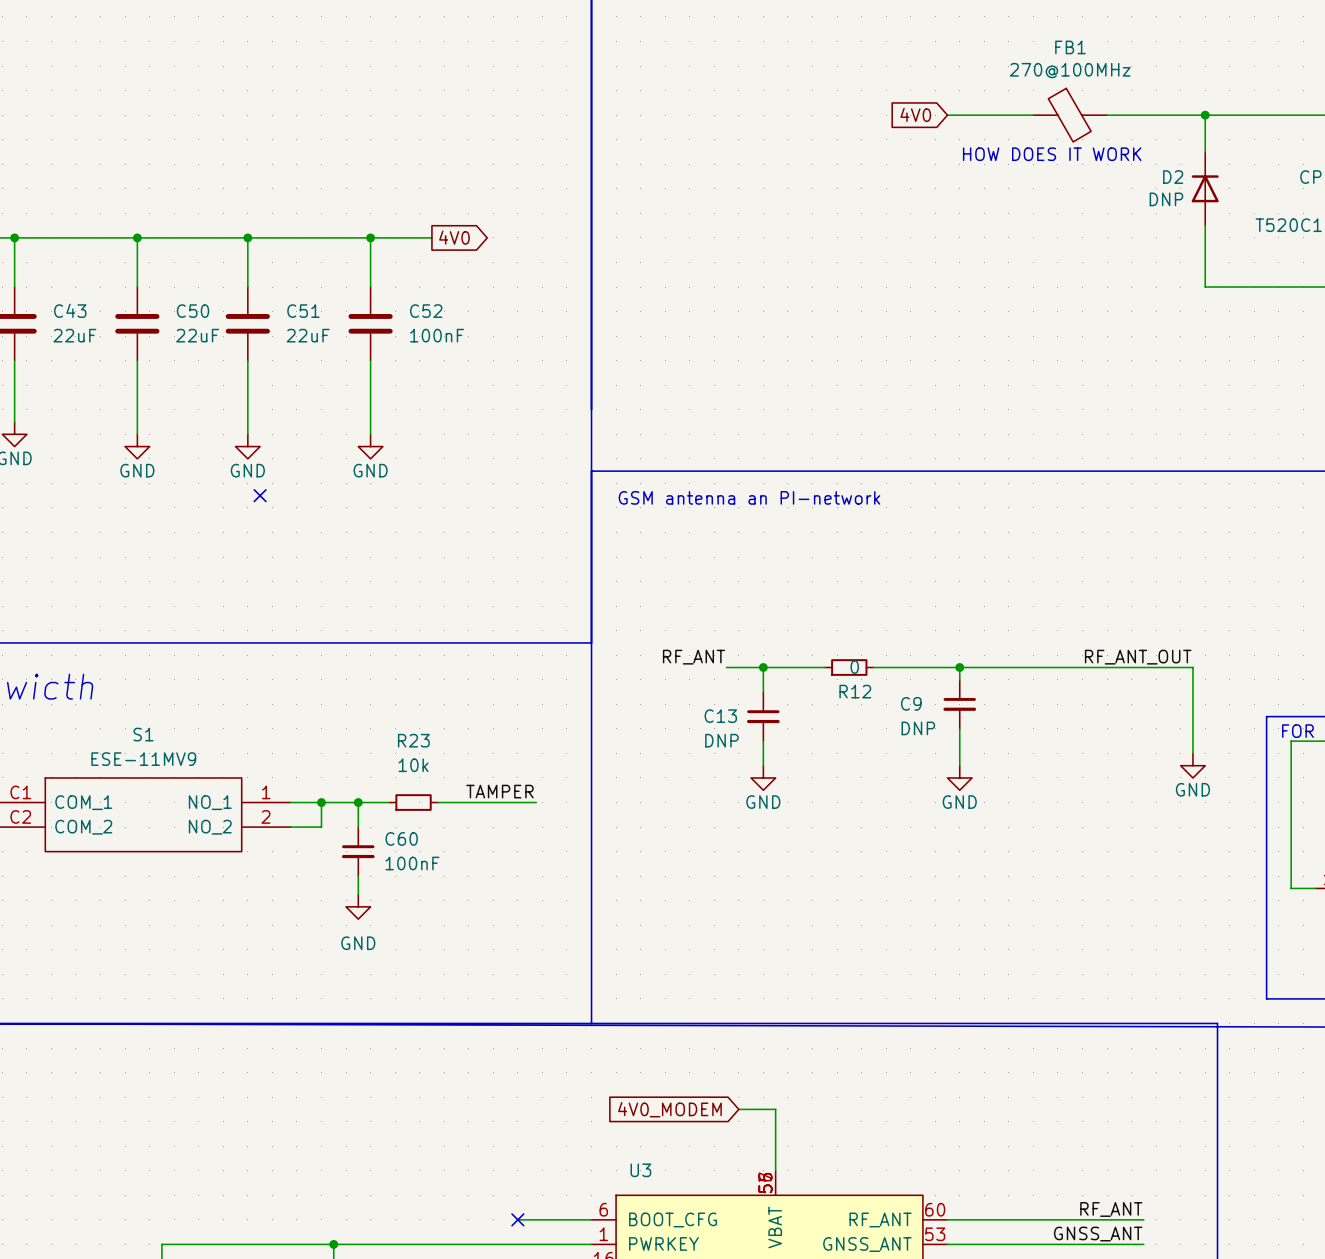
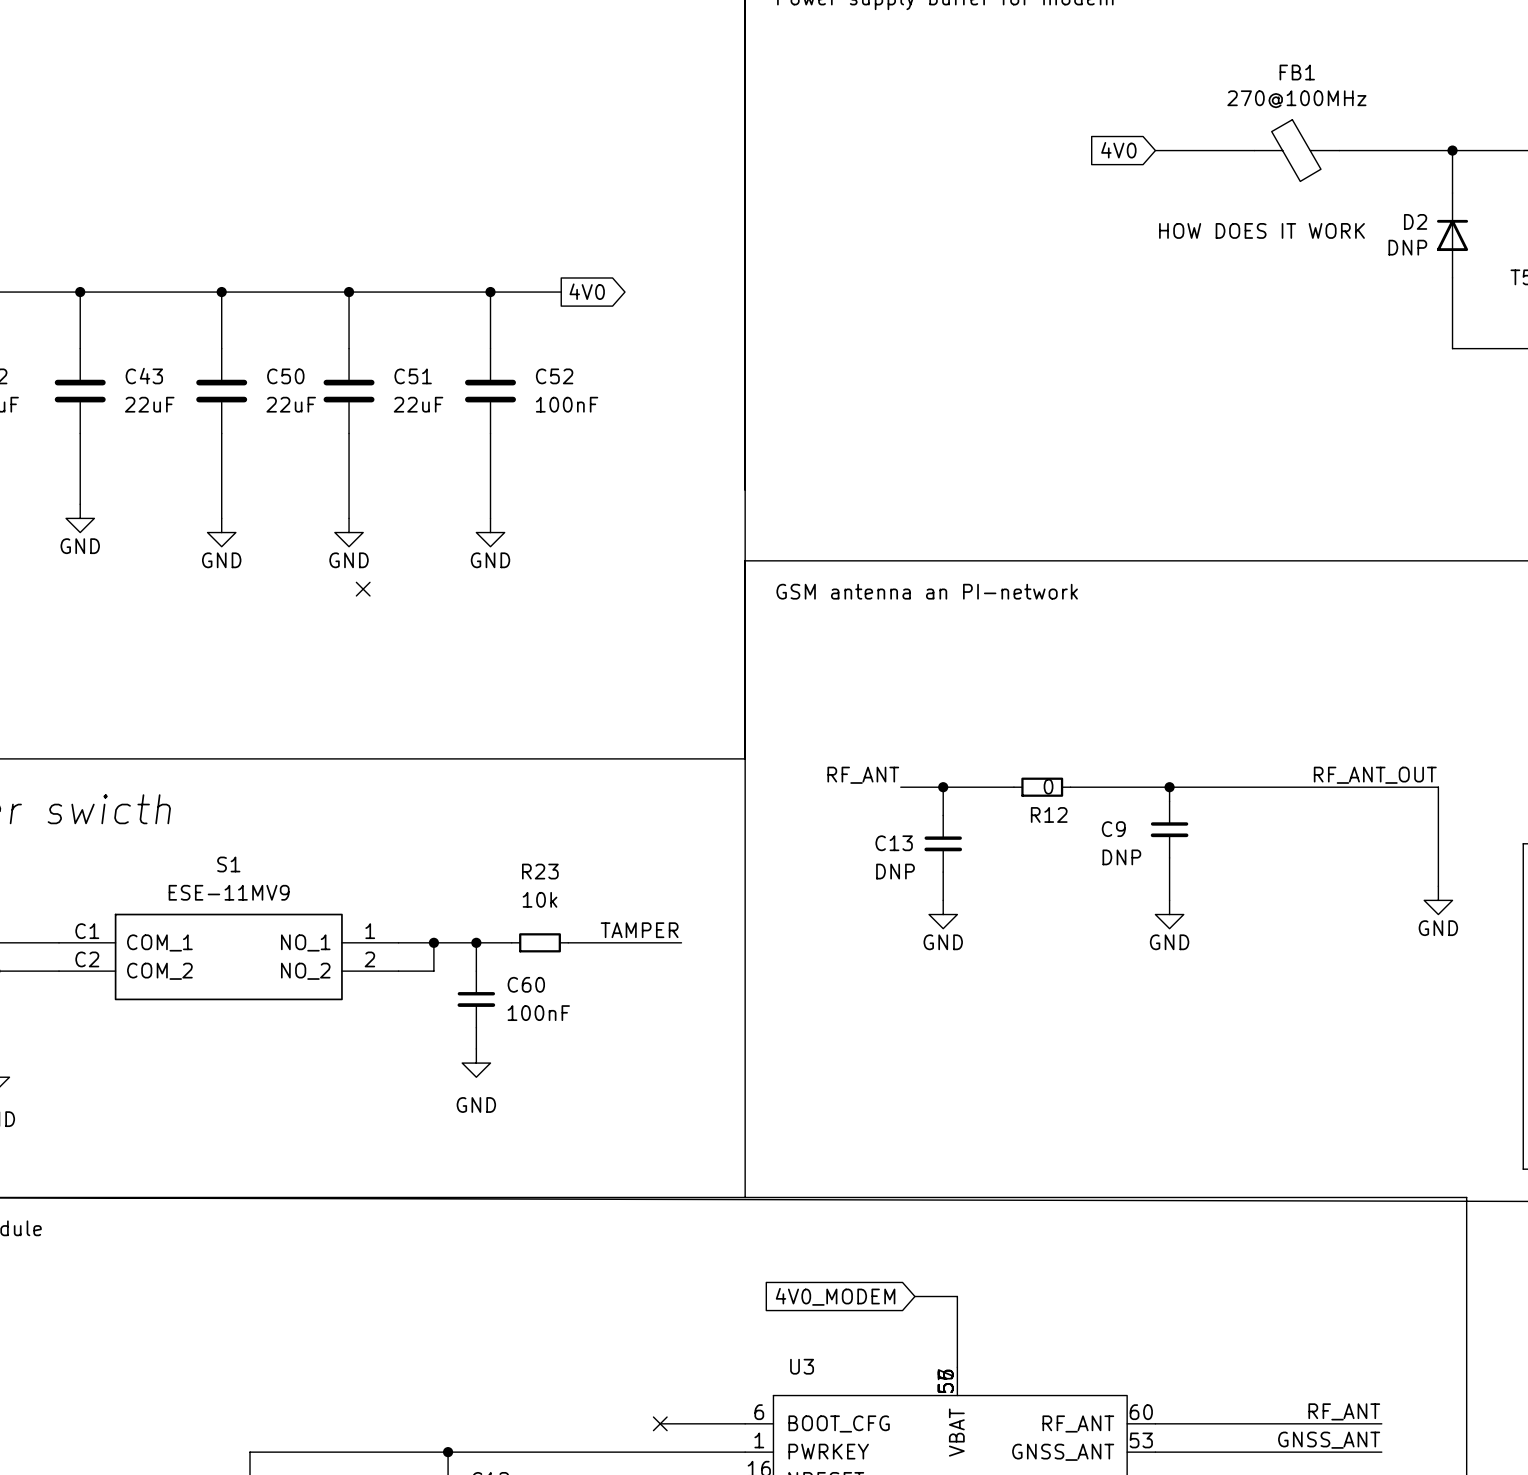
text position: HOW DOES IT WORK (1052, 154) -> HOW DOES IT WORK (1261, 230)

